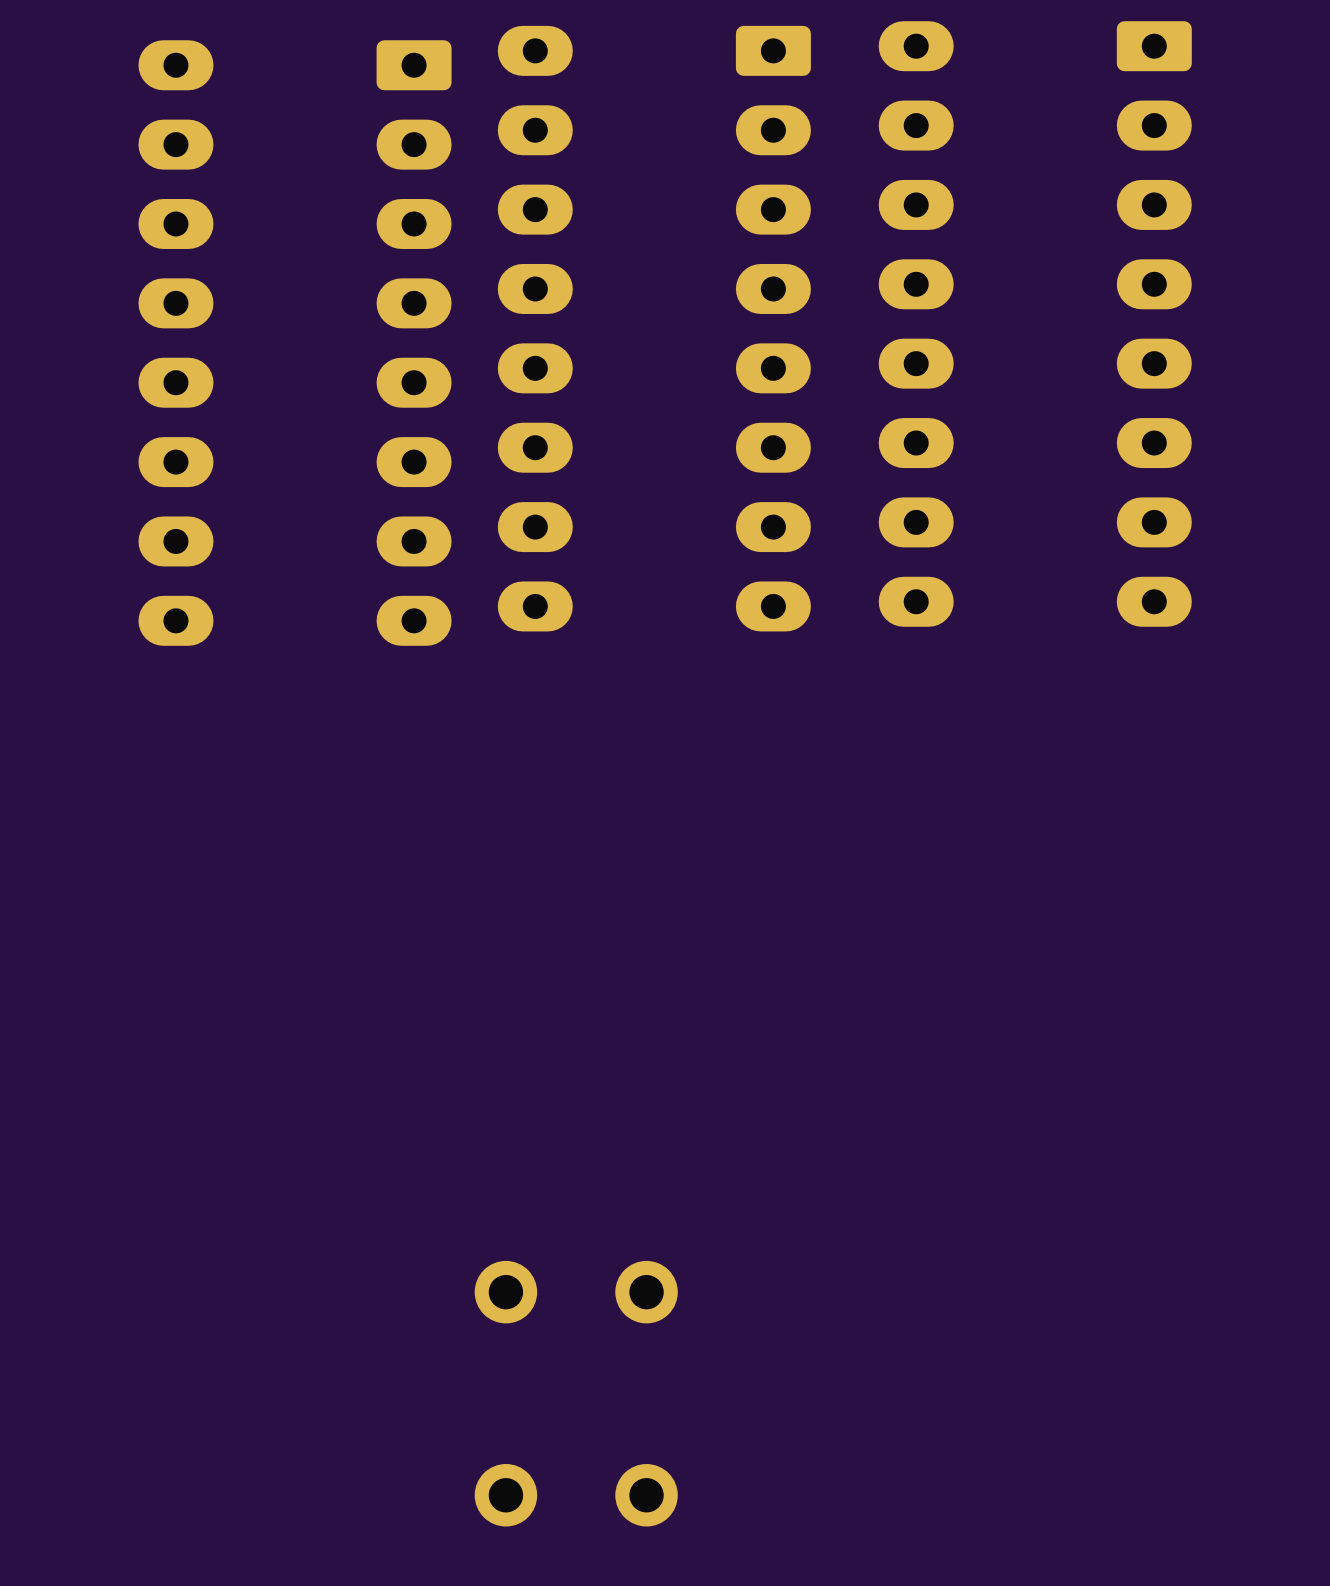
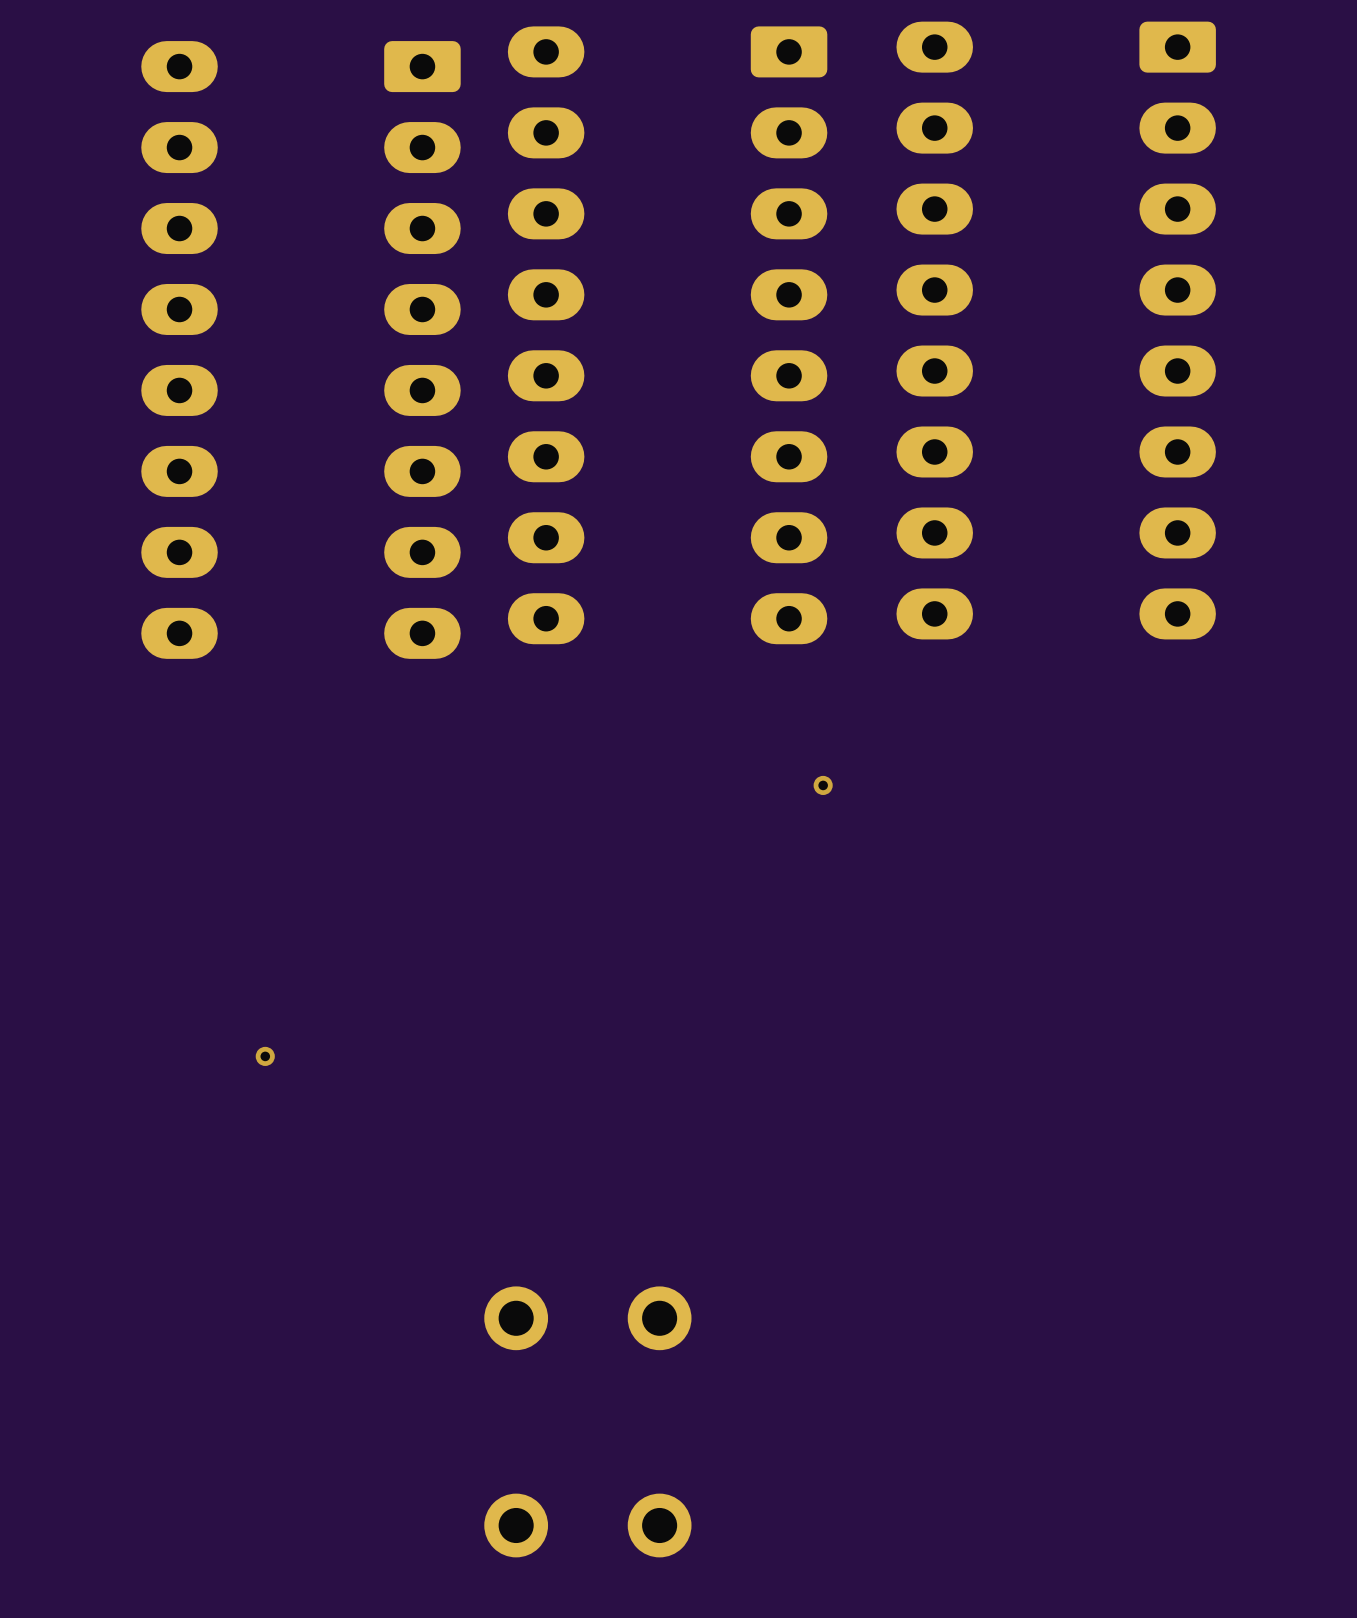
via: none -> (823, 785)
via: none -> (265, 1056)

